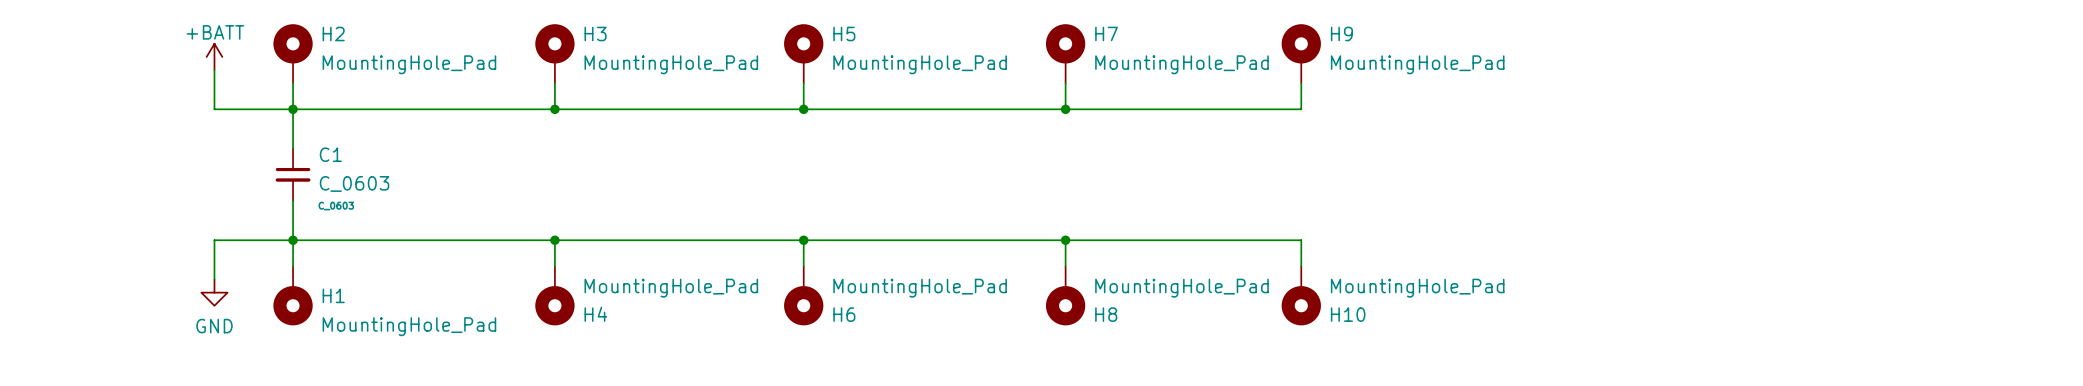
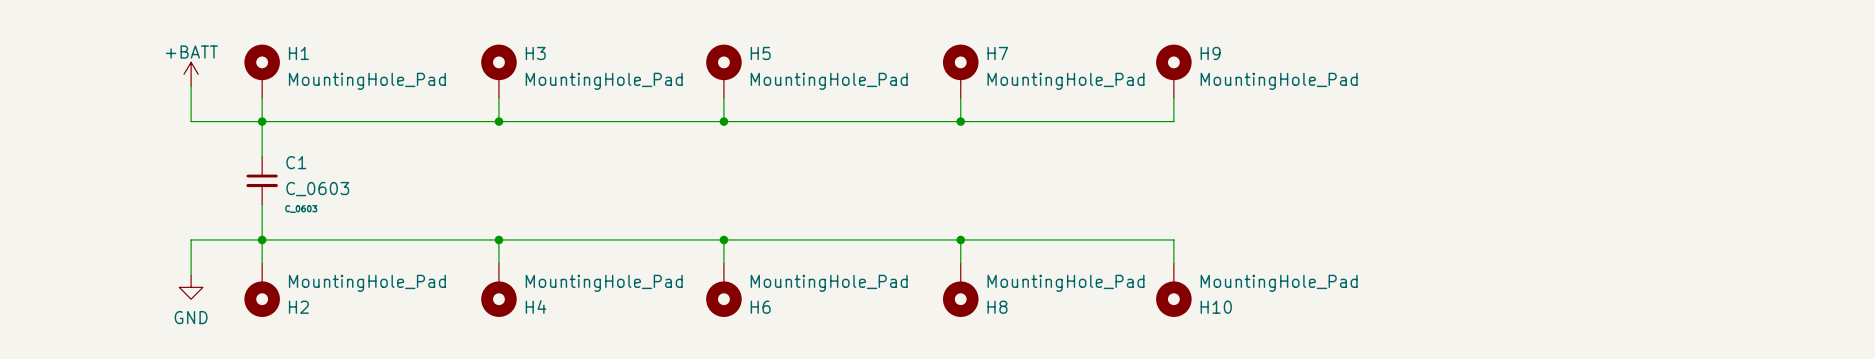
H2 name: H2 (333, 33) -> H1 (298, 53)
H1 name: H1 (333, 295) -> H2 (298, 307)
H1 value position: MountingHole_Pad (409, 326) -> MountingHole_Pad (367, 283)

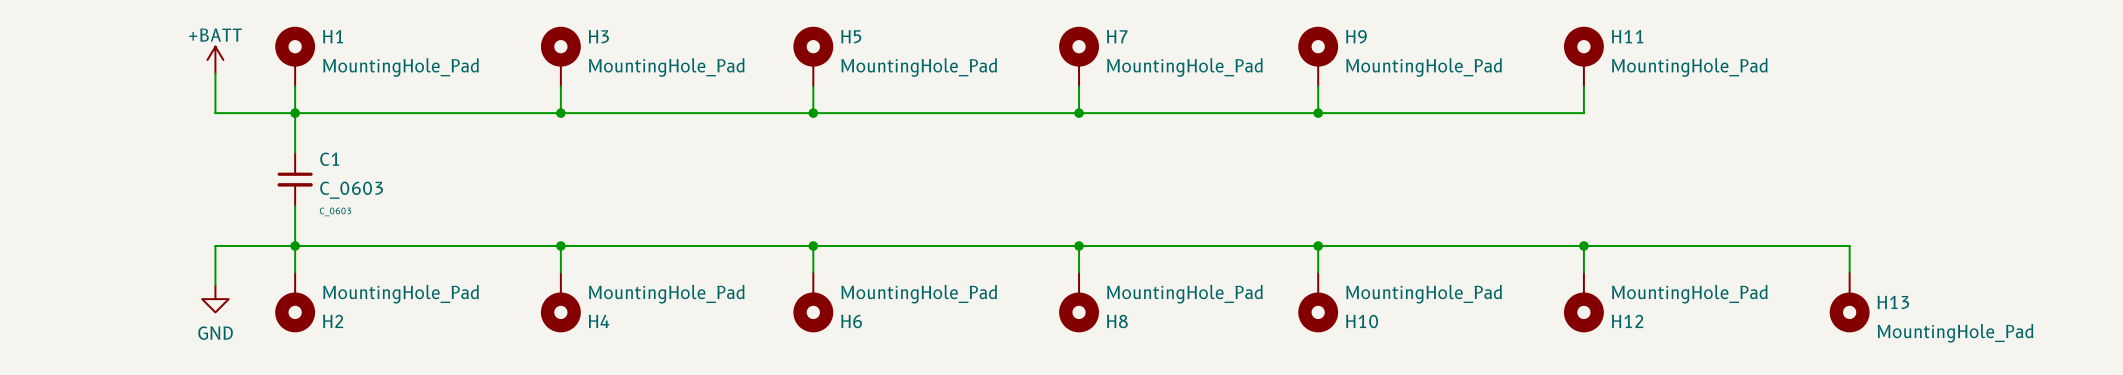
H11: none -> MountingHole_Pad (1583, 56)
wire: none -> (1583, 86) (1583, 113) (1318, 113)
junction: none -> (1318, 113)
wire: none -> (1318, 245) (1849, 245) (1849, 272)
junction: none -> (1318, 245)
wire: none -> (1583, 245) (1583, 272)
junction: none -> (1583, 245)
H12: none -> MountingHole_Pad (1583, 302)
H13: none -> MountingHole_Pad (1849, 302)

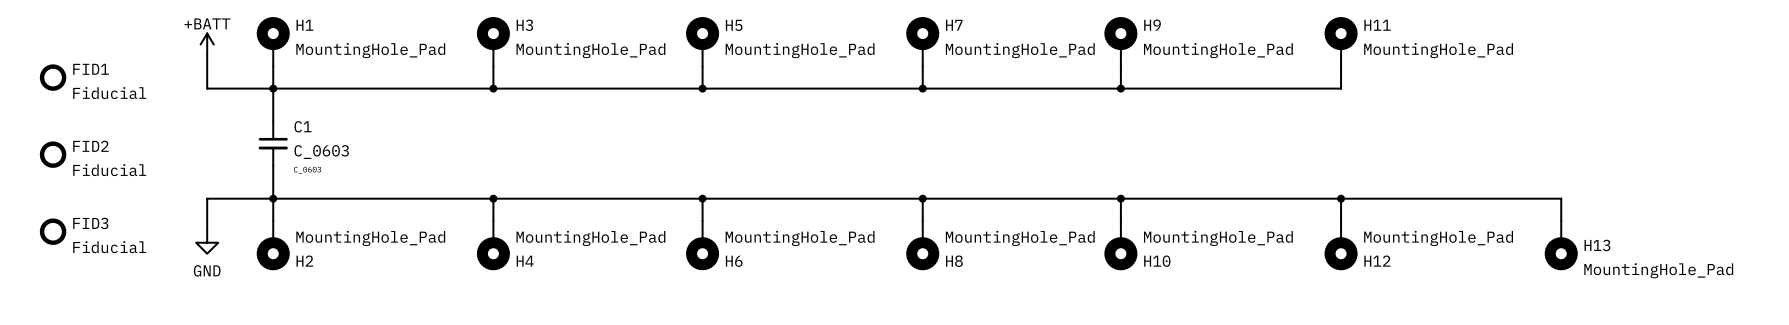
FID1: none -> Fiducial (53, 77)
FID2: none -> Fiducial (53, 154)
FID3: none -> Fiducial (53, 231)

